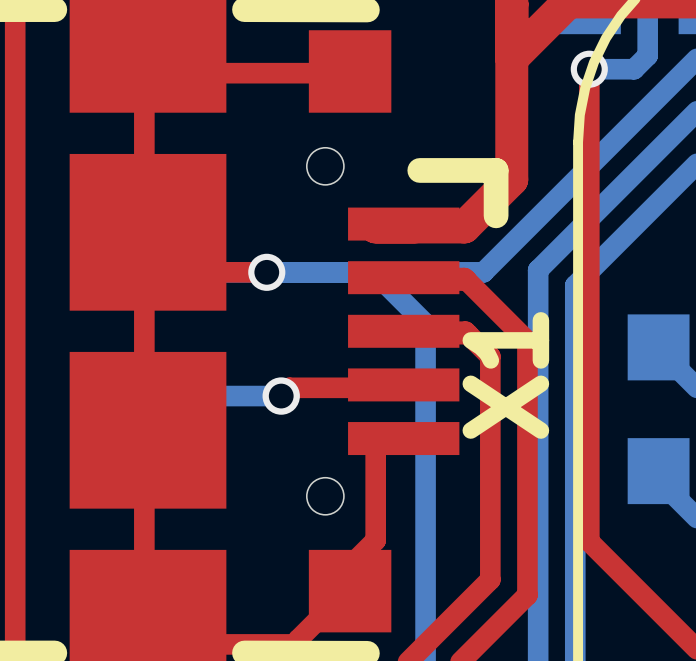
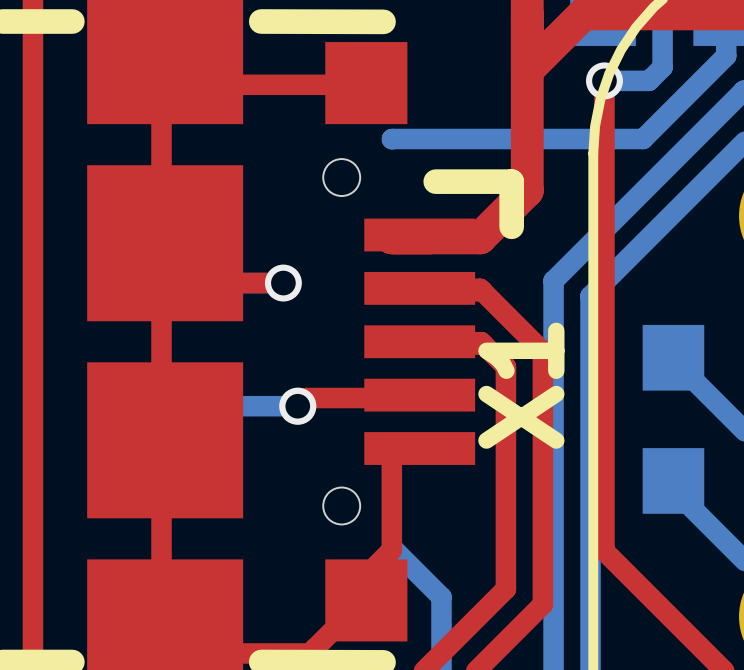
bottom track: (628, 127) (483, 272) (266, 272) -> (643, 139) (392, 139)
bottom track: (374, 272) (425, 323) (425, 587) -> (391, 549) (394, 549) (441, 597)

